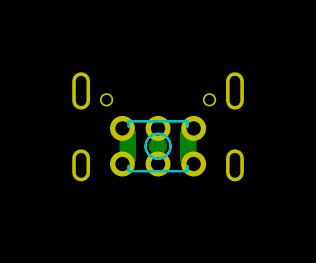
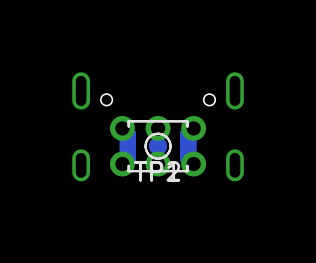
part: (158, 146) -> none
part: none -> (158, 146)
part: none -> (158, 146)

